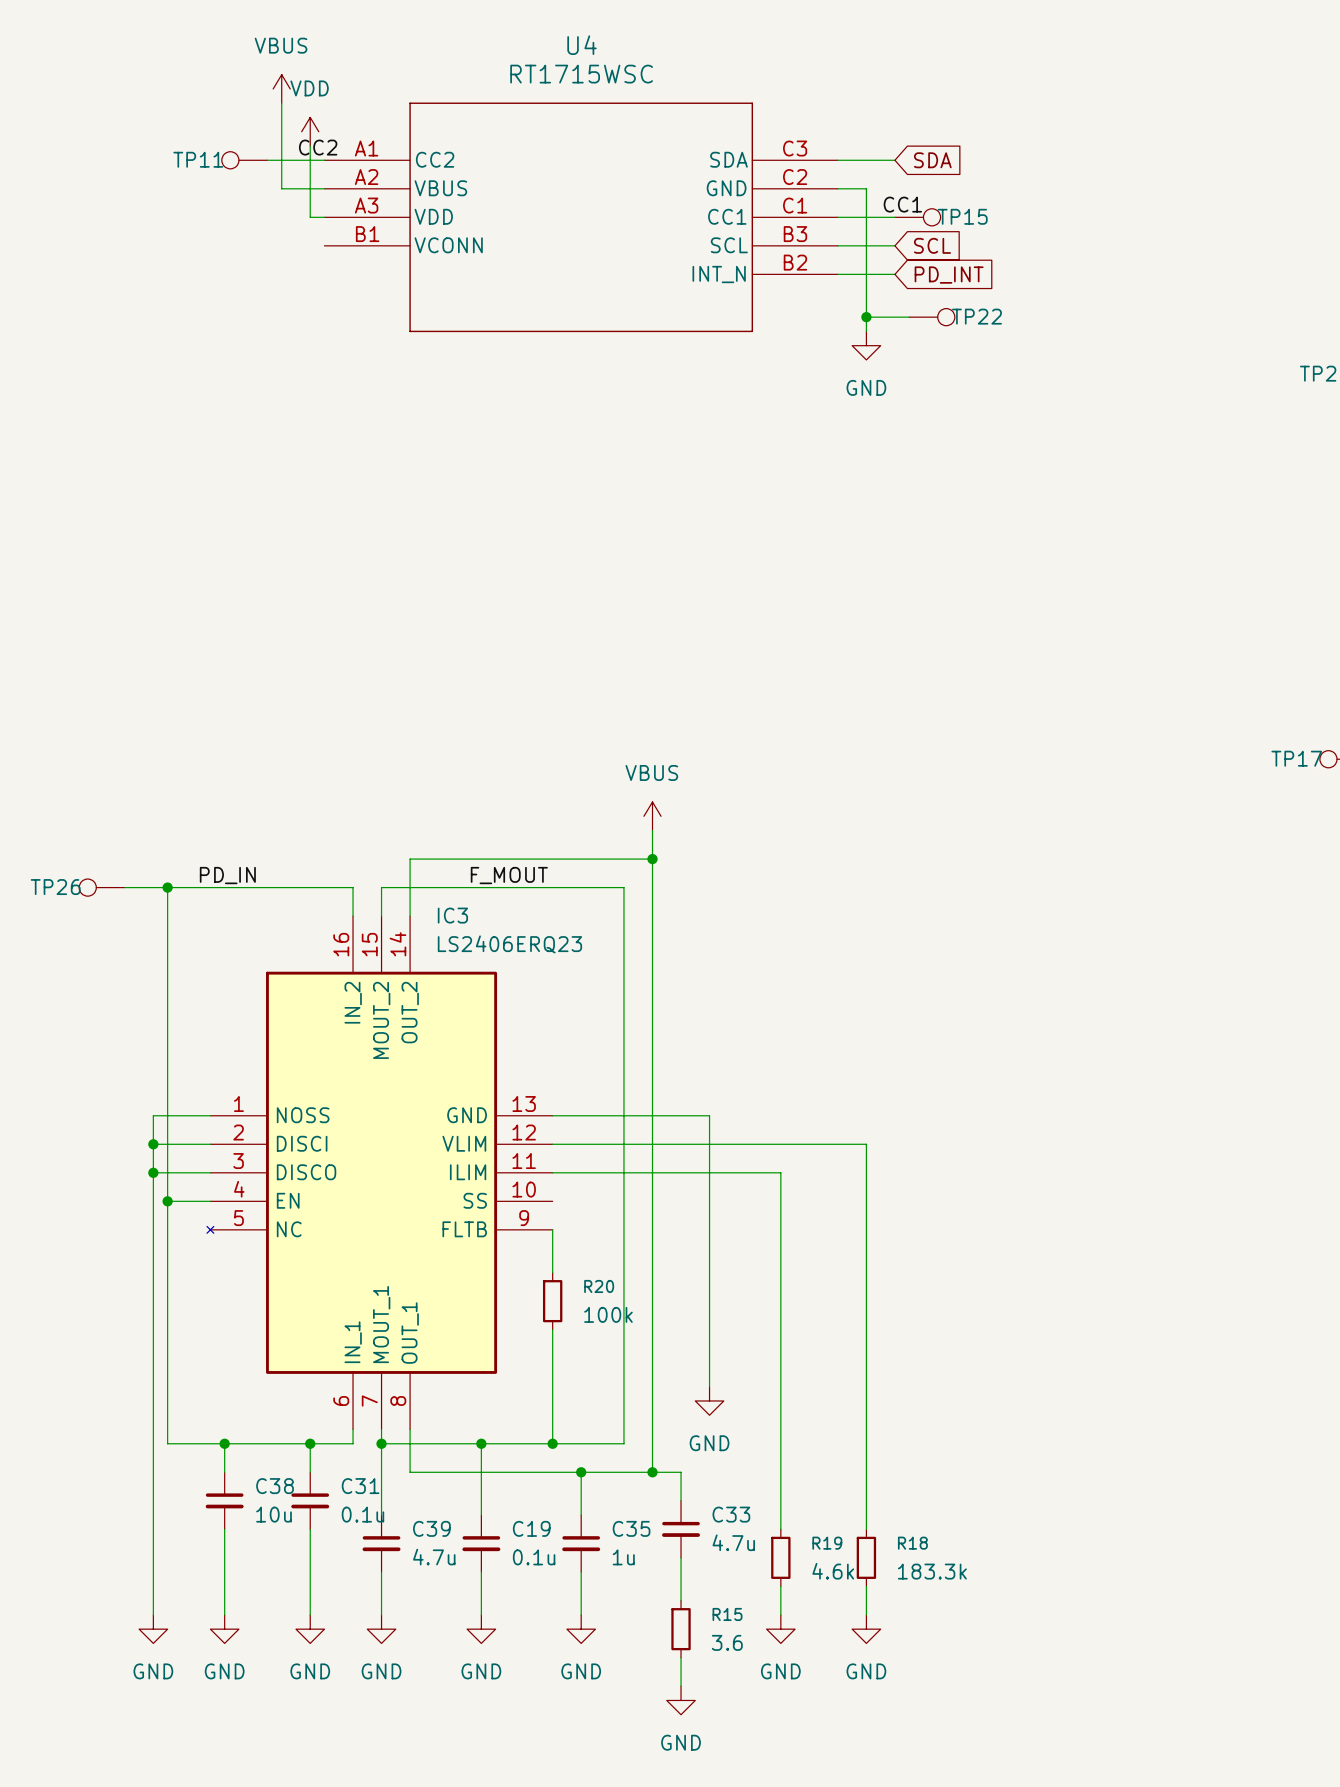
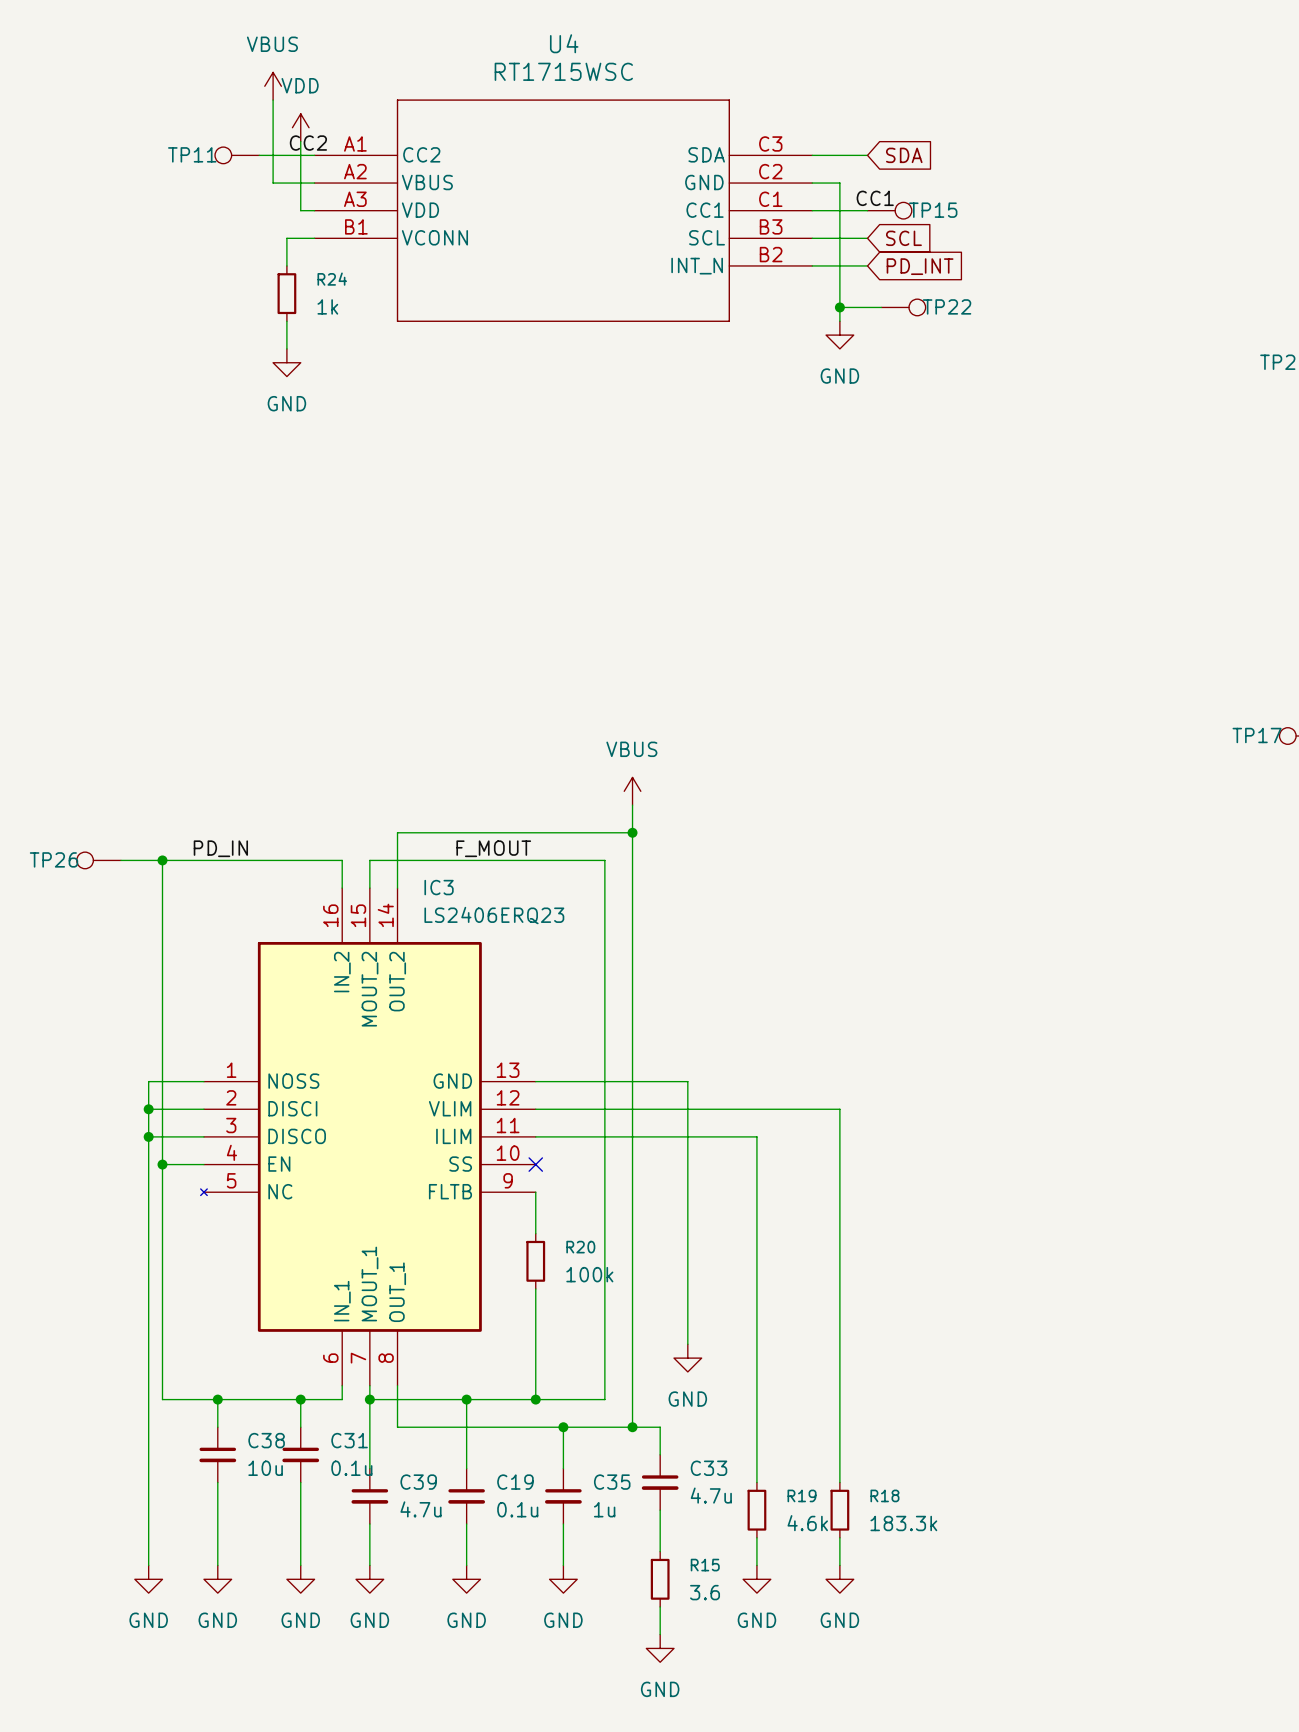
wire: none -> (314, 238) (286, 238) (286, 265)
R24: none -> 1k (286, 293)
wire: none -> (286, 321) (286, 348)
power symbol: none -> GND (286, 362)
no-connect mark: none -> (535, 1164)

